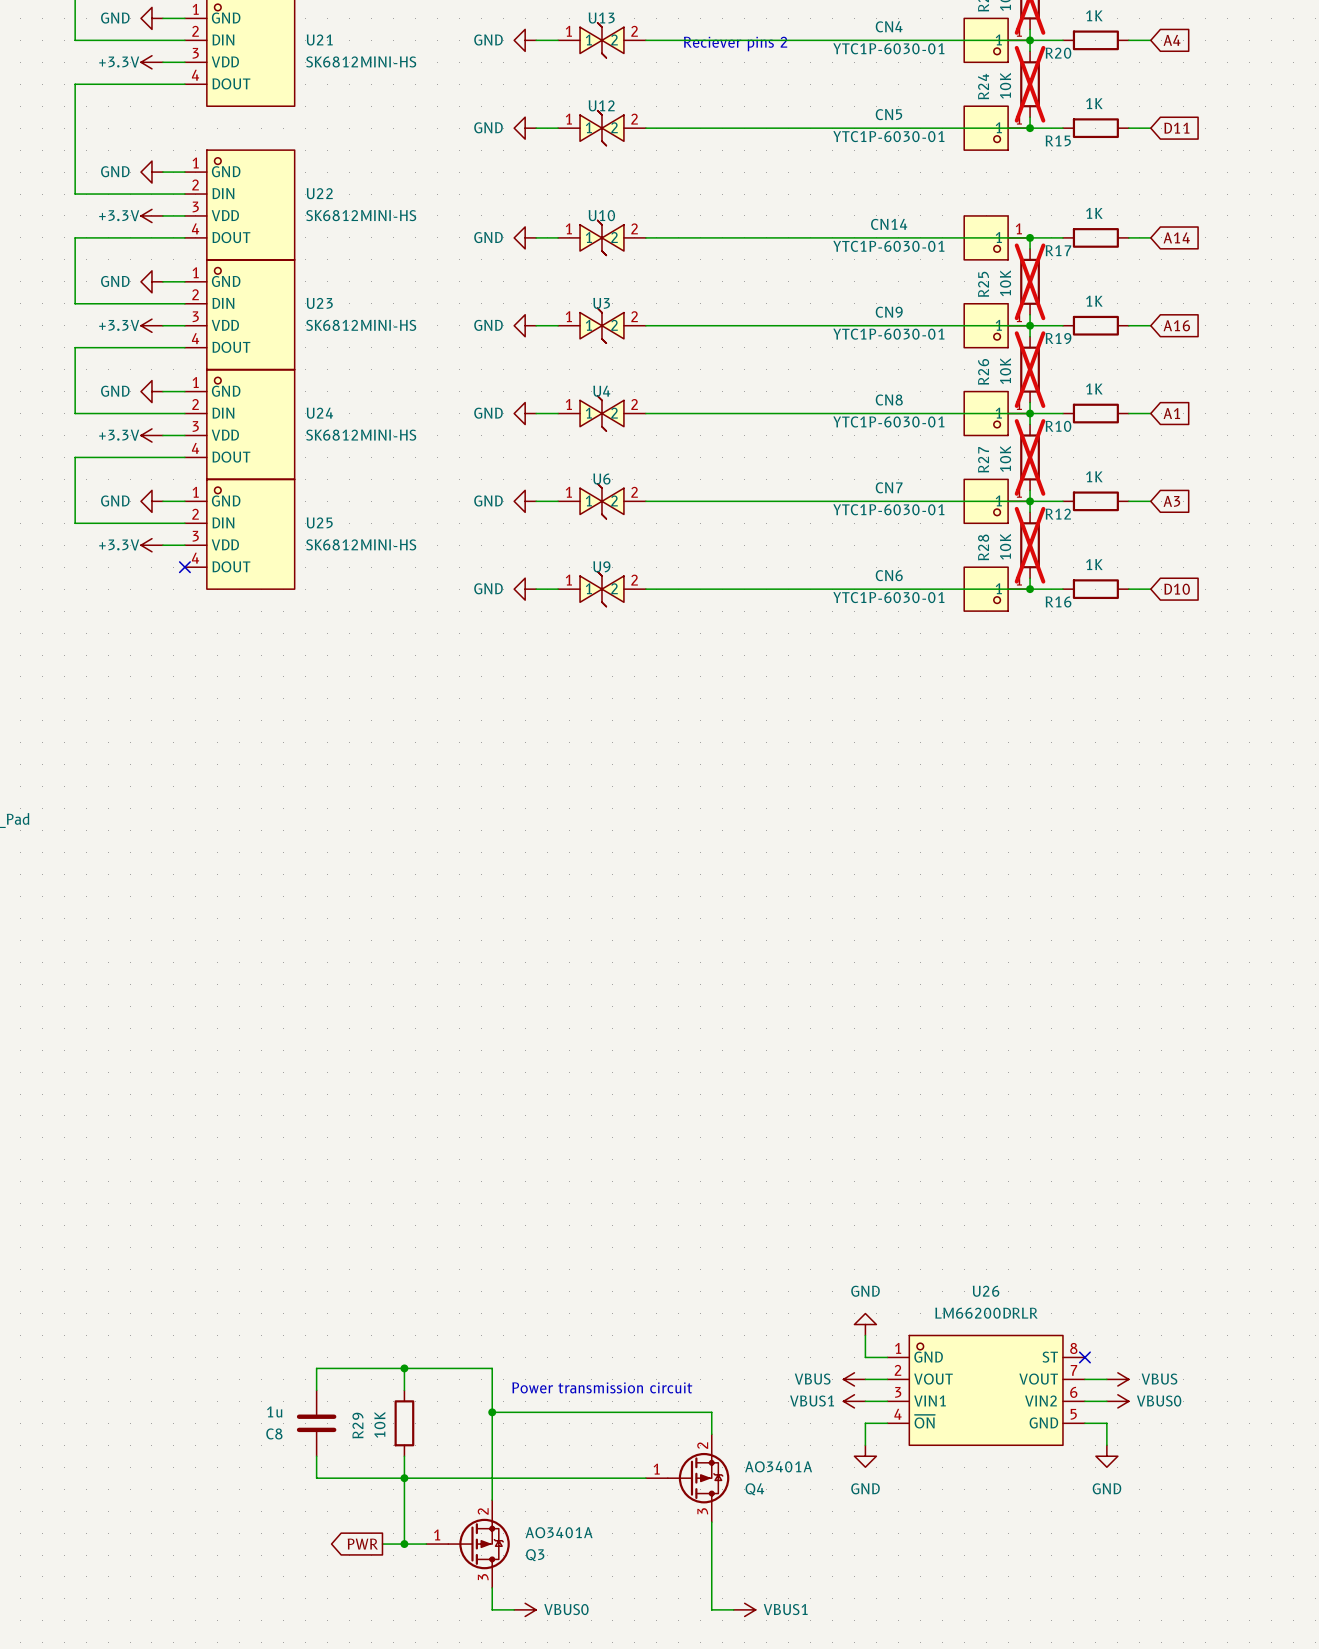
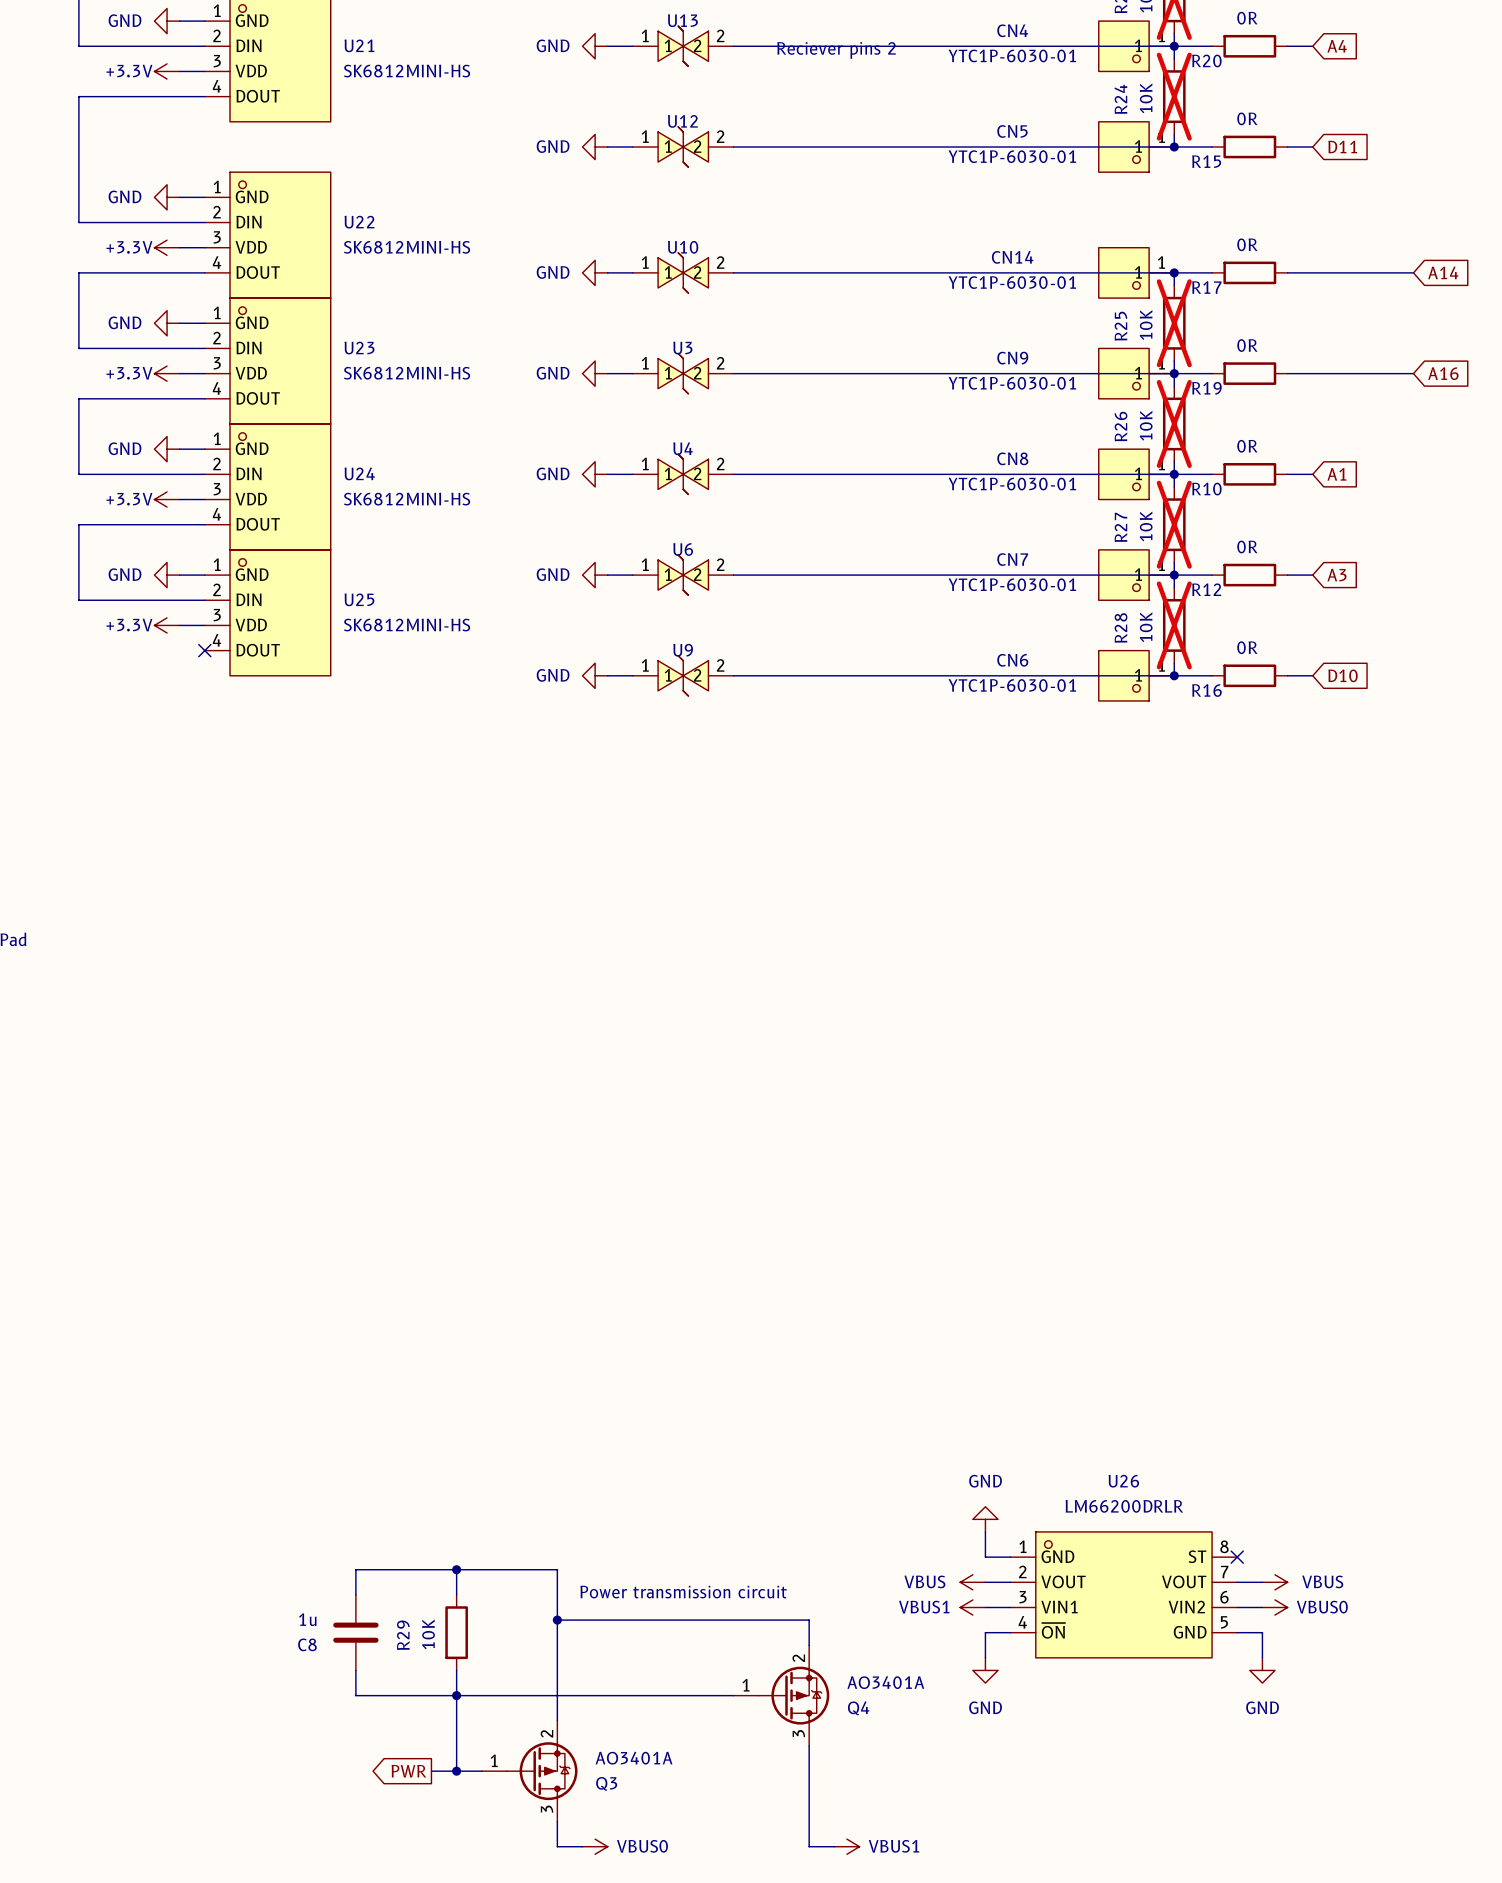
R20 value: 1K (1094, 15) -> 0R (1247, 18)
R15 value: 1K (1094, 103) -> 0R (1247, 118)
R17 value: 1K (1094, 213) -> 0R (1247, 244)
wire: none -> (1312, 272) (1413, 272)
global label position: A14 (1176, 237) -> A14 (1443, 272)
R19 value: 1K (1094, 301) -> 0R (1247, 345)
wire: none -> (1312, 373) (1413, 373)
global label position: A16 (1176, 325) -> A16 (1443, 373)
R10 value: 1K (1094, 388) -> 0R (1247, 446)
R12 value: 1K (1094, 476) -> 0R (1247, 546)
R16 value: 1K (1094, 564) -> 0R (1247, 647)

